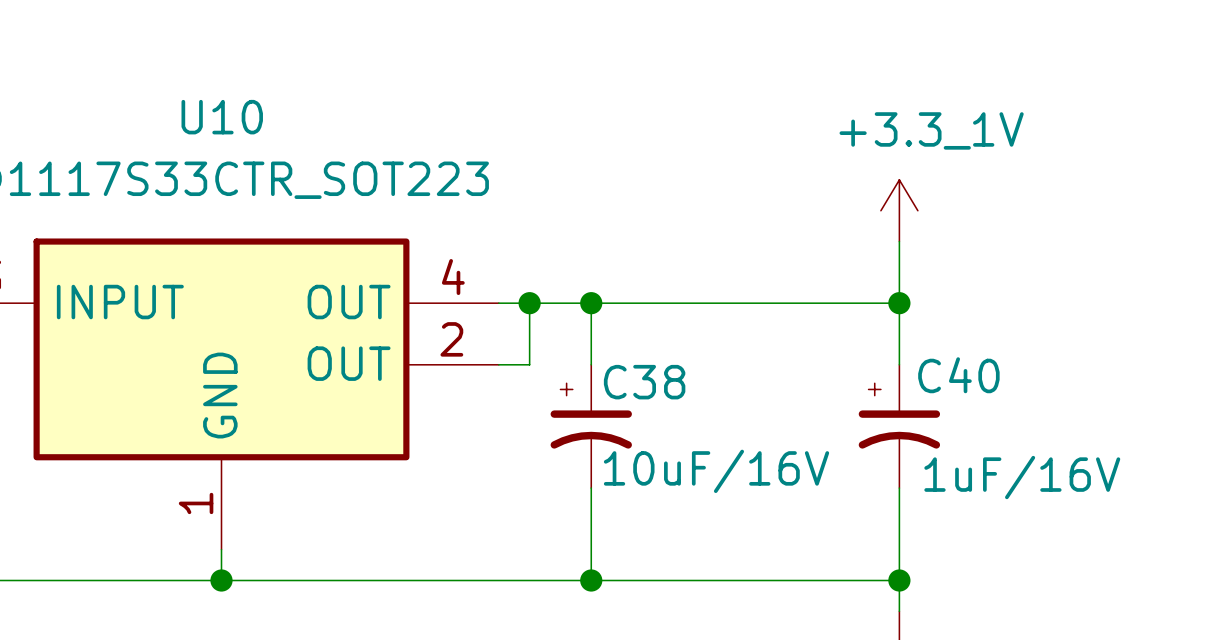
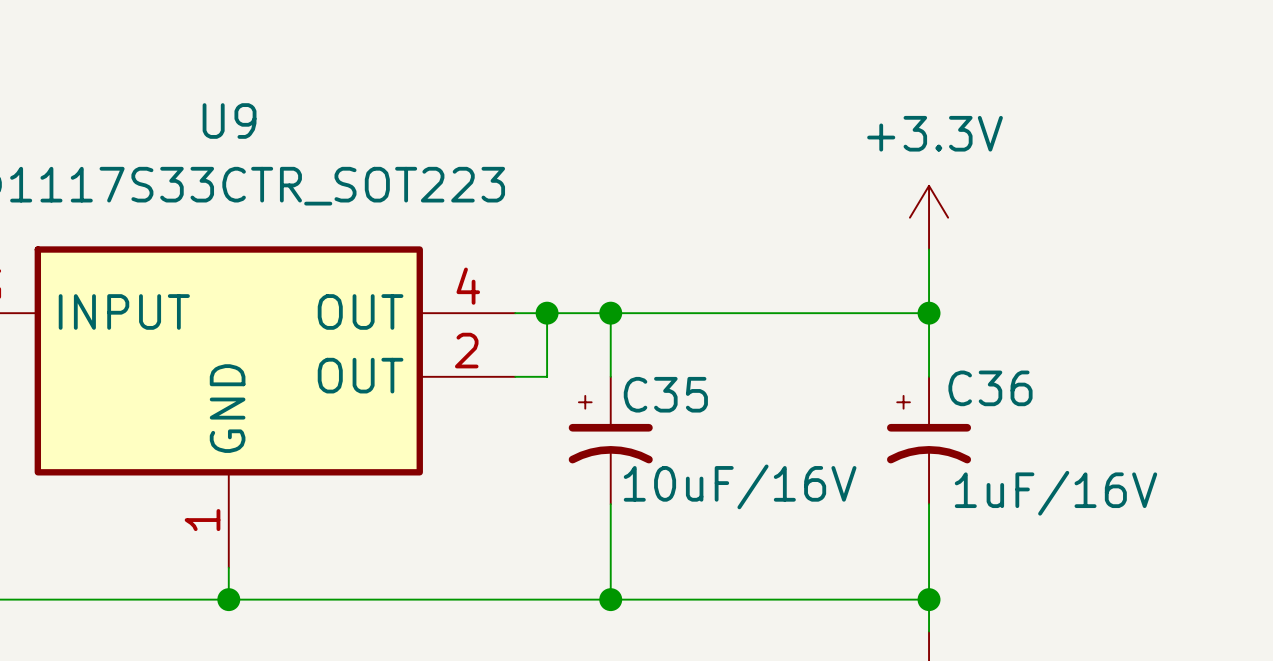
U10 name: U10 (222, 117) -> U9 (229, 121)
power symbol: +3.3_1V (899, 210) -> +3.3V (929, 217)
C40 name: C40 (958, 375) -> C36 (990, 388)
C38 name: C38 (644, 382) -> C35 (665, 394)

